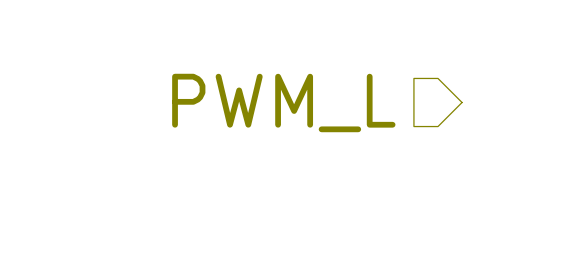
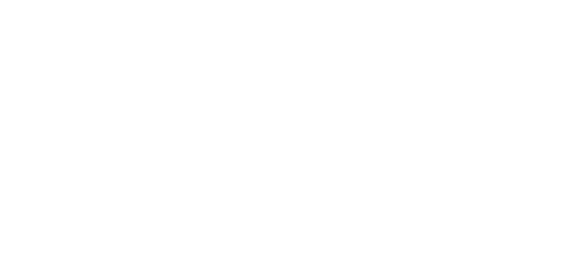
hierarchical label: PWM_L (283, 102) -> none

